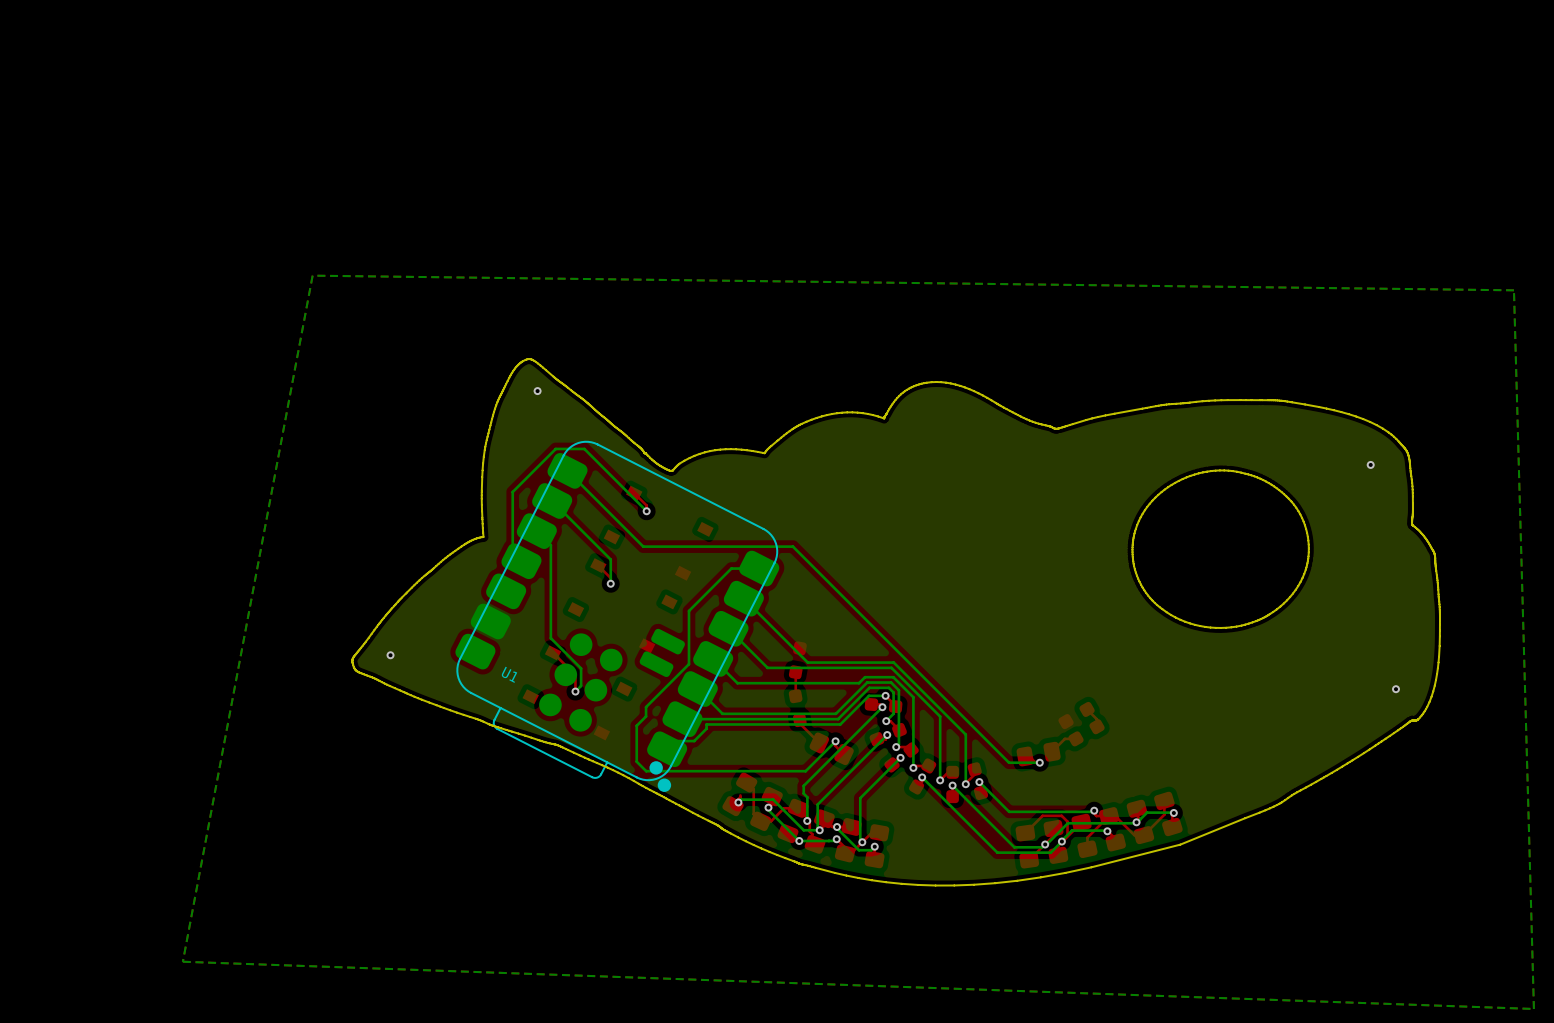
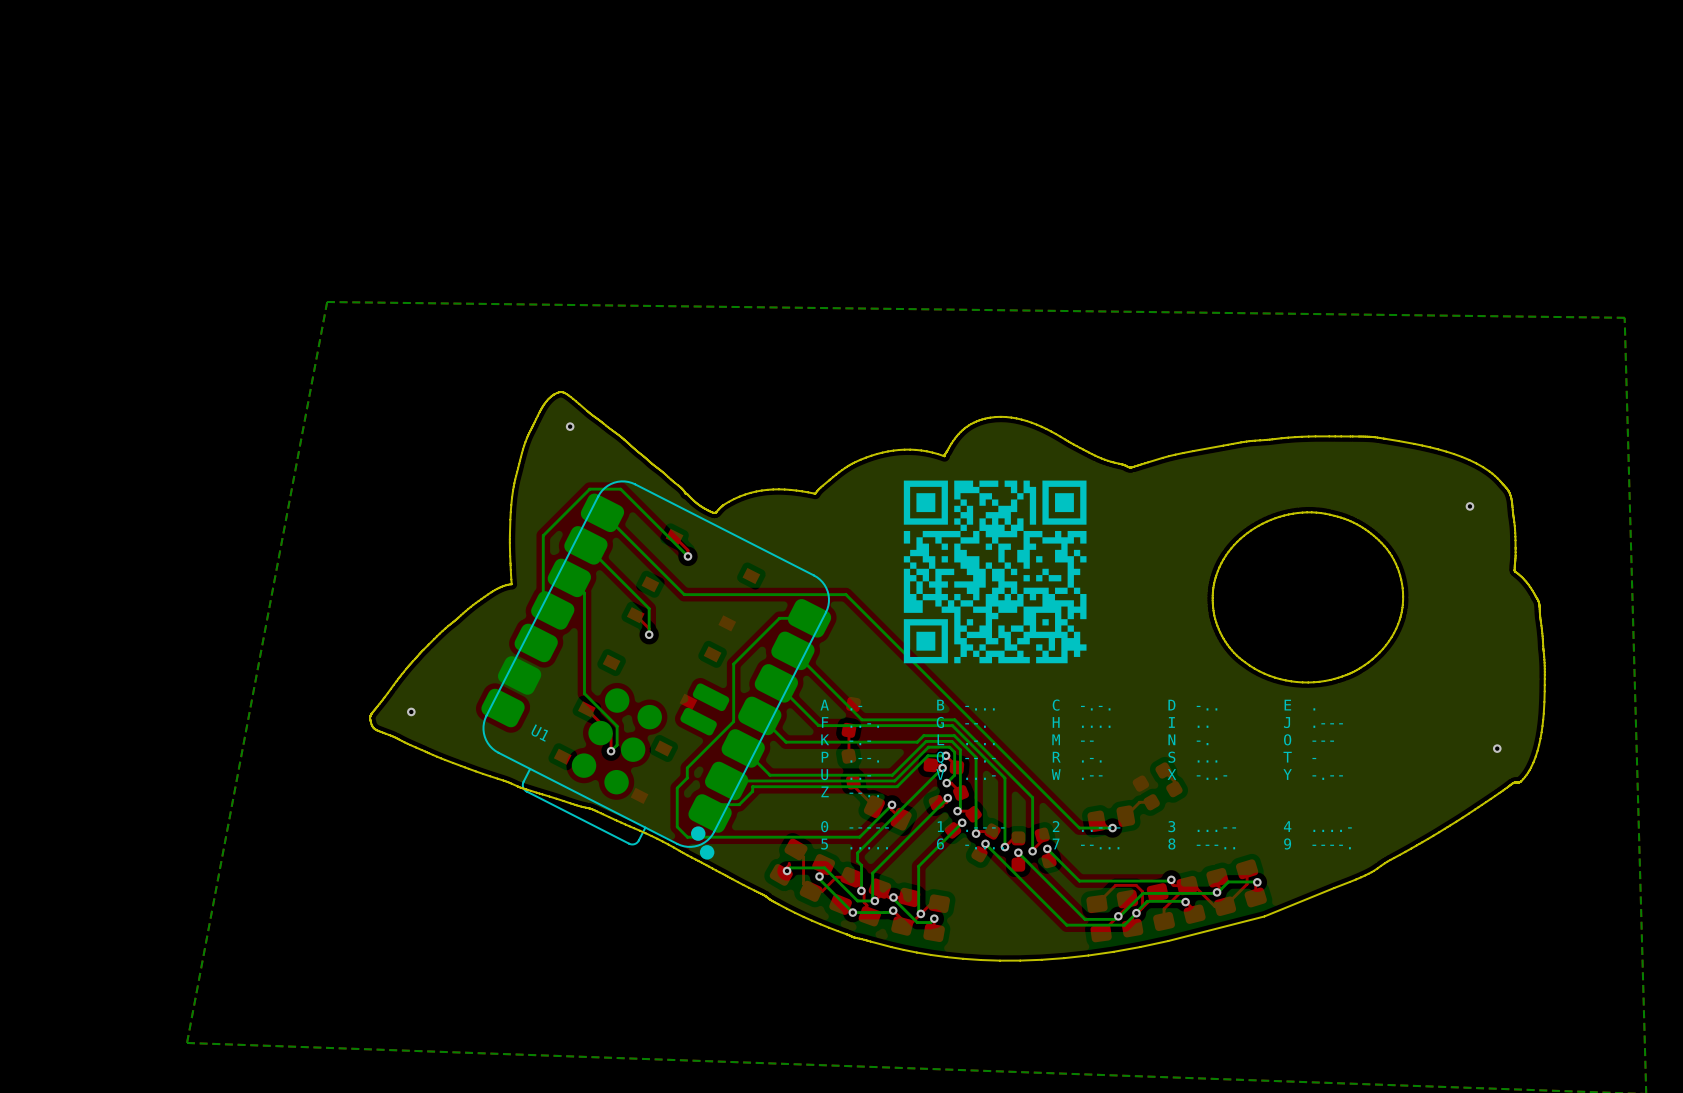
drawing: none -> [903, 480, 1087, 664]
text: none -> A .- B -... C -.-. D -.. E . (1067, 705)
text: none -> F ..-. G --. H .... I .. J .--- (1082, 722)
text: none -> K -.- L .-.. M -- N -. O --- (1077, 739)
text: none -> P .--. Q --.- R .-. S ... T - (1068, 758)
text: none -> U ..- V ...- W .-- X -..- Y -.-- (1082, 774)
text: none -> Z --.. (850, 791)
text: none -> 0 ----- 1 .---- 2 ..--- 3 ...-- 4 ....- (1086, 826)
text: none -> 5 ..... 6 -.... 7 --... 8 ---.. 9 ----. (1086, 843)

